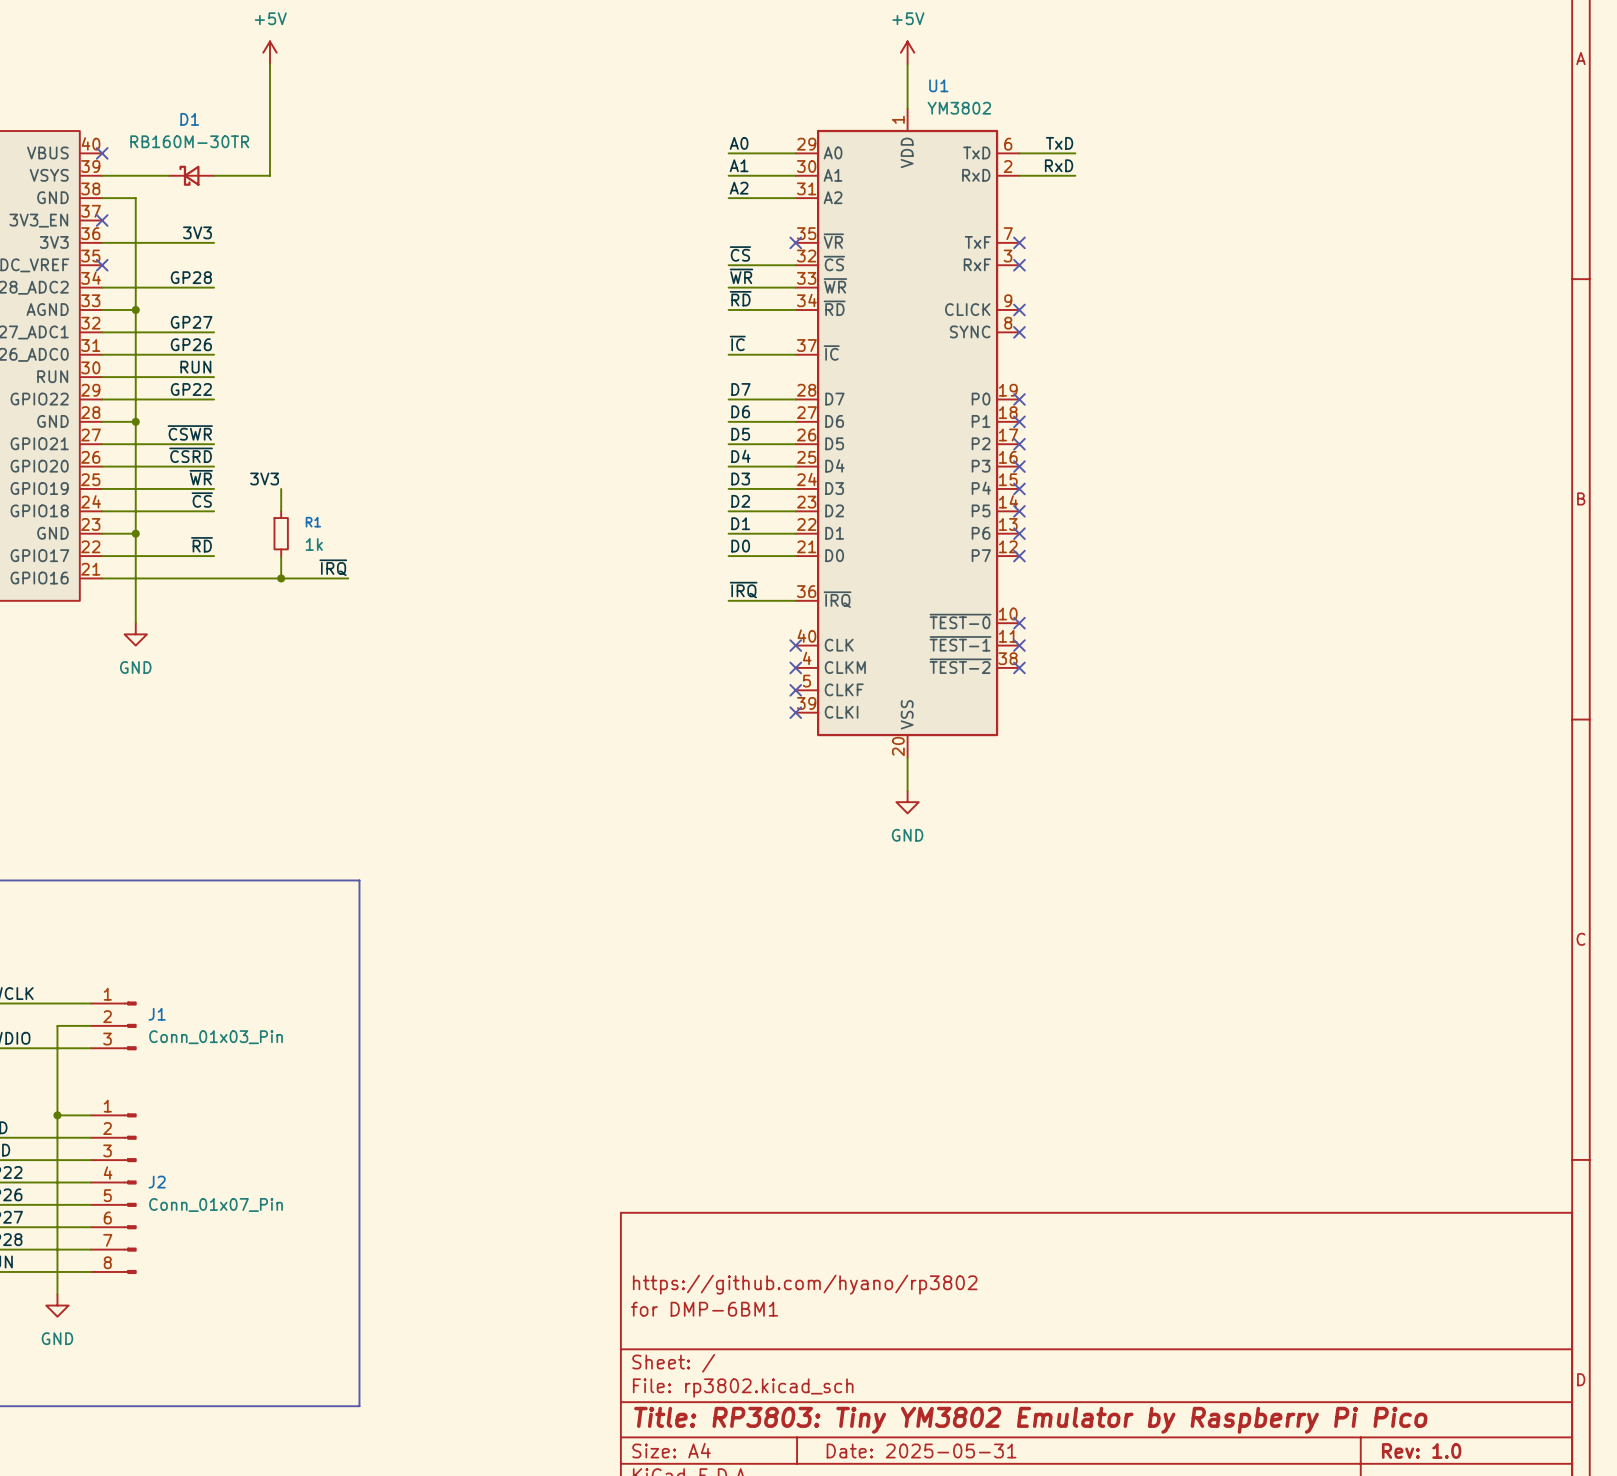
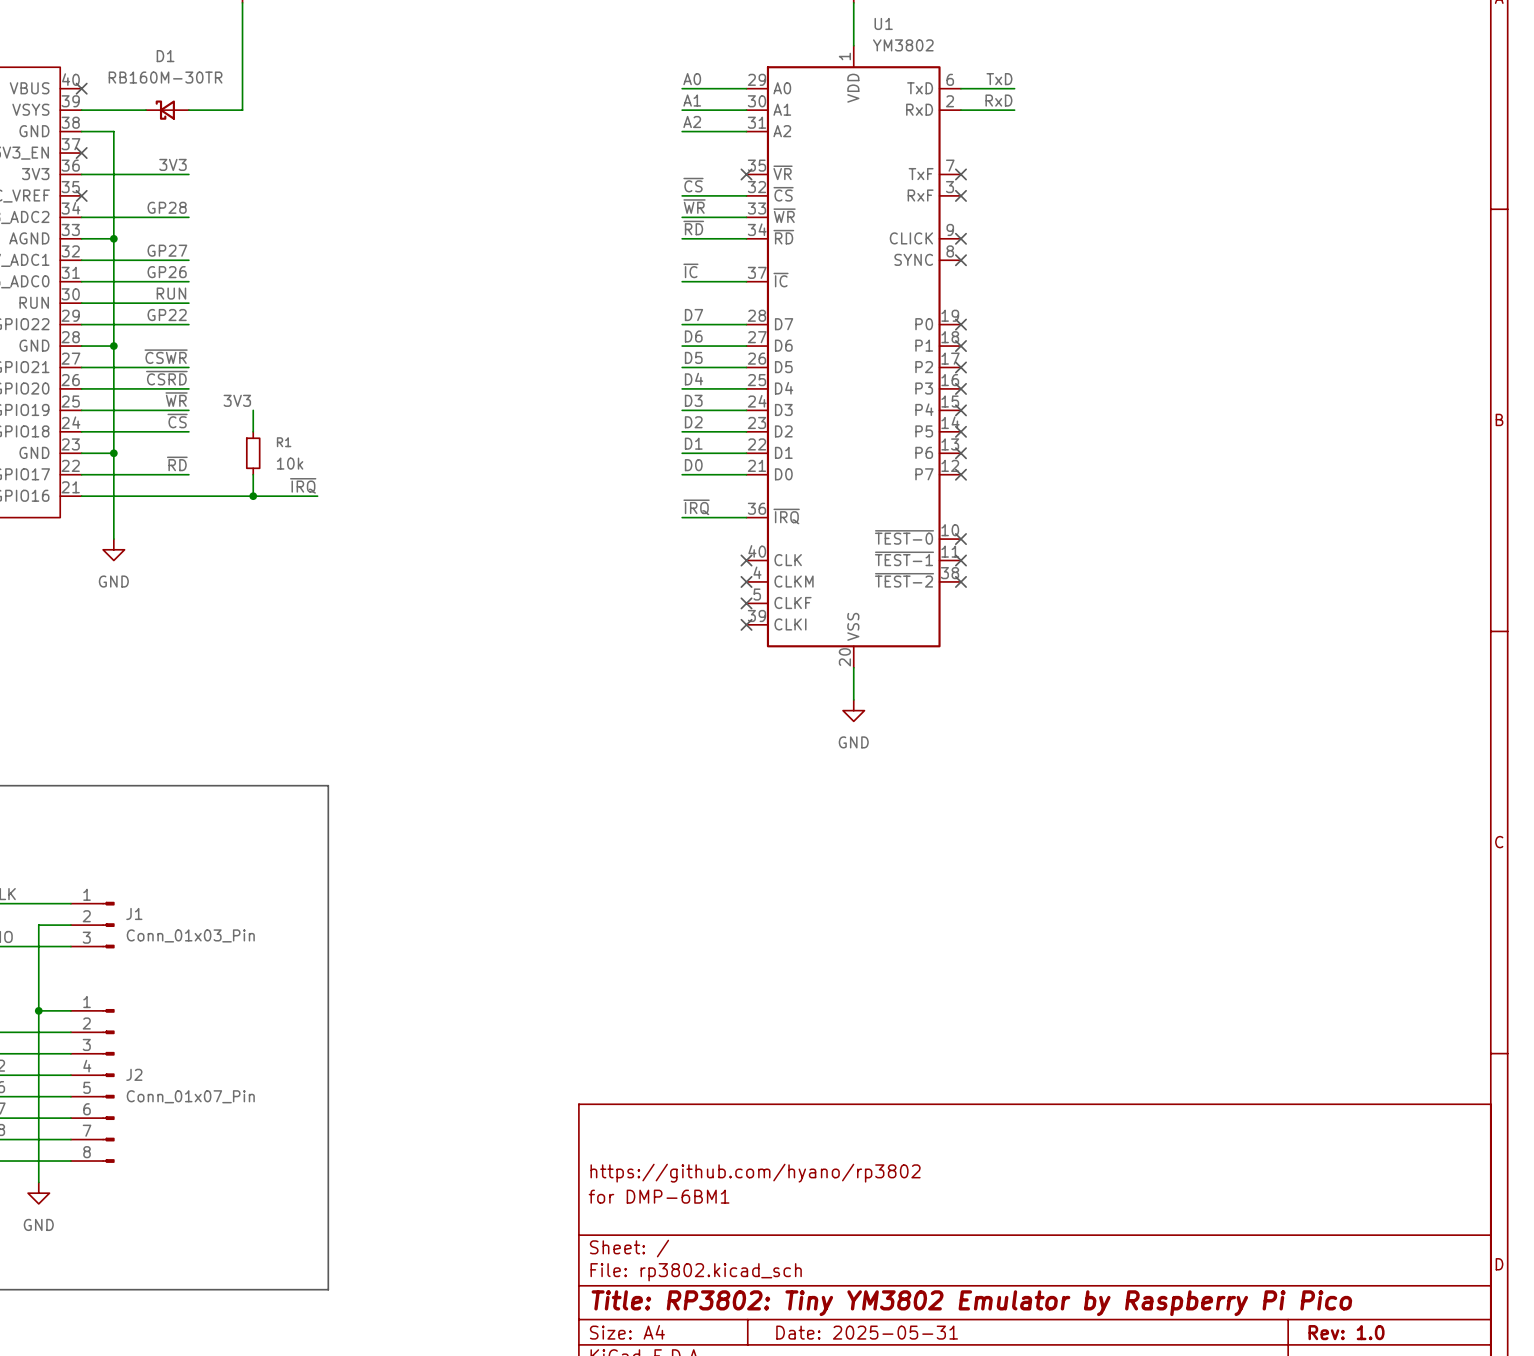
R1 value: 1k (314, 544) -> 10k (290, 463)
title block: Title: RP3803: Tiny YM3802 Emulator by Raspberry Pi Pico (1030, 1420) -> Title: RP3802: Tiny YM3802 Emulator by Raspberry Pi Pico (971, 1303)

